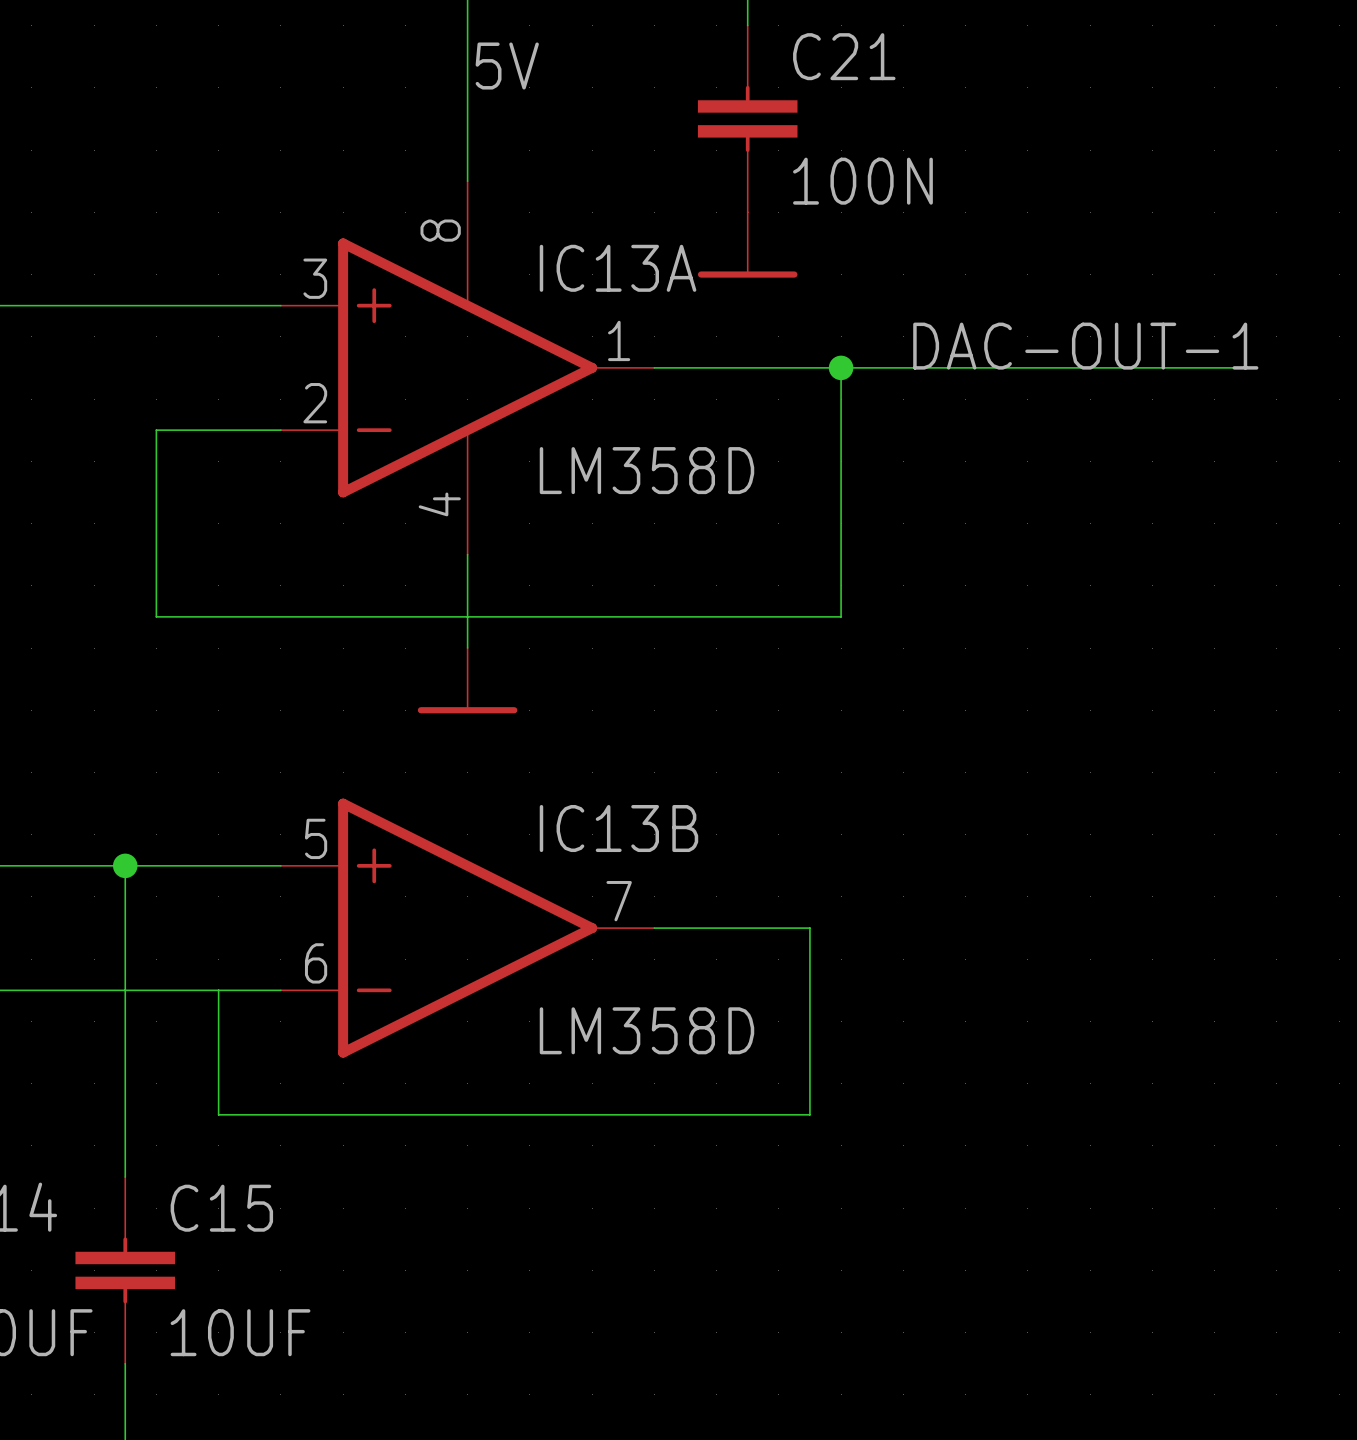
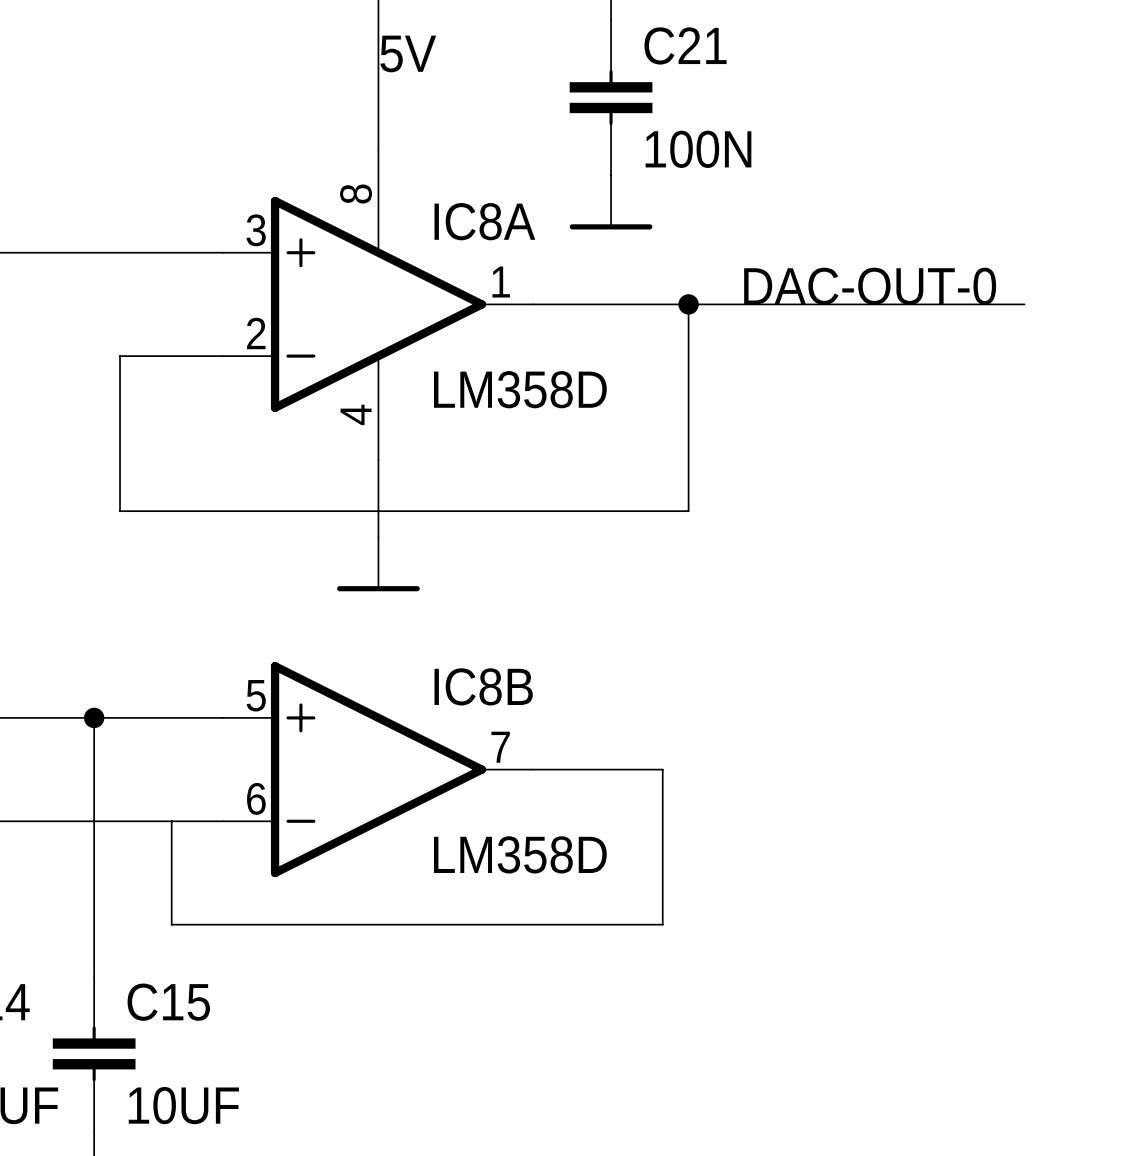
IC13A name: IC13A (618, 268) -> IC8A (484, 221)
label: DAC-OUT-1 (1085, 346) -> DAC-OUT-0 (870, 286)
IC13B name: IC13B (618, 828) -> IC8B (483, 686)

